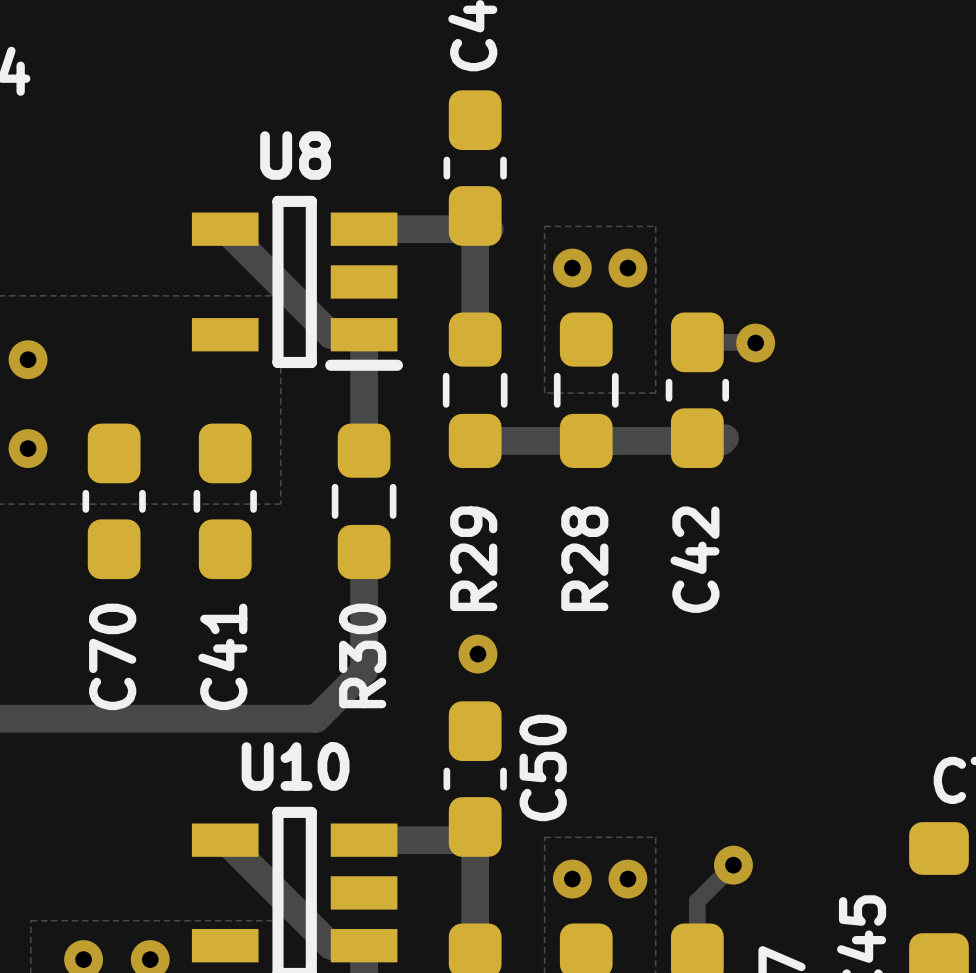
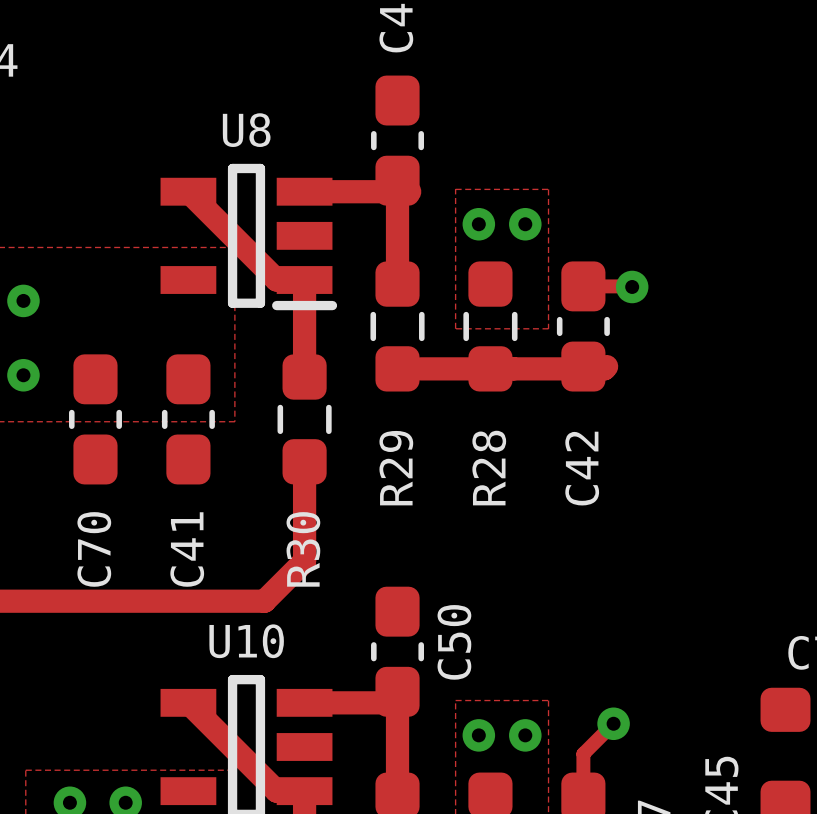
via: (477, 654) -> none

